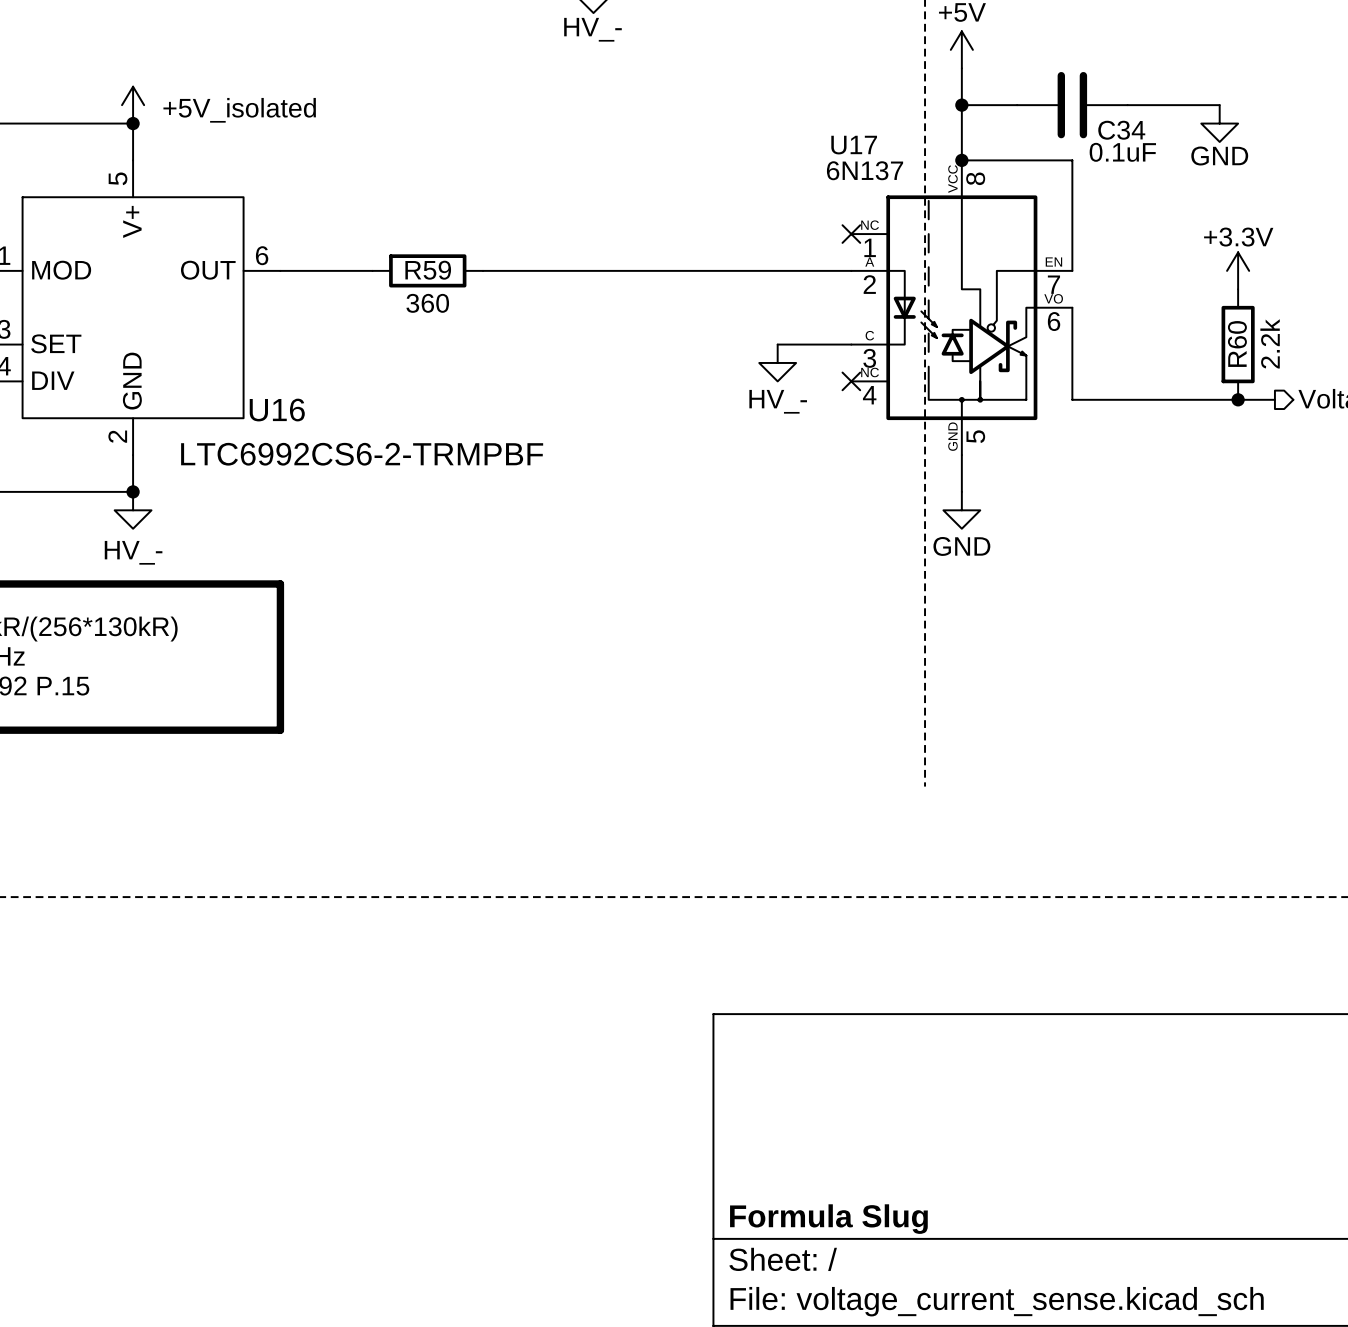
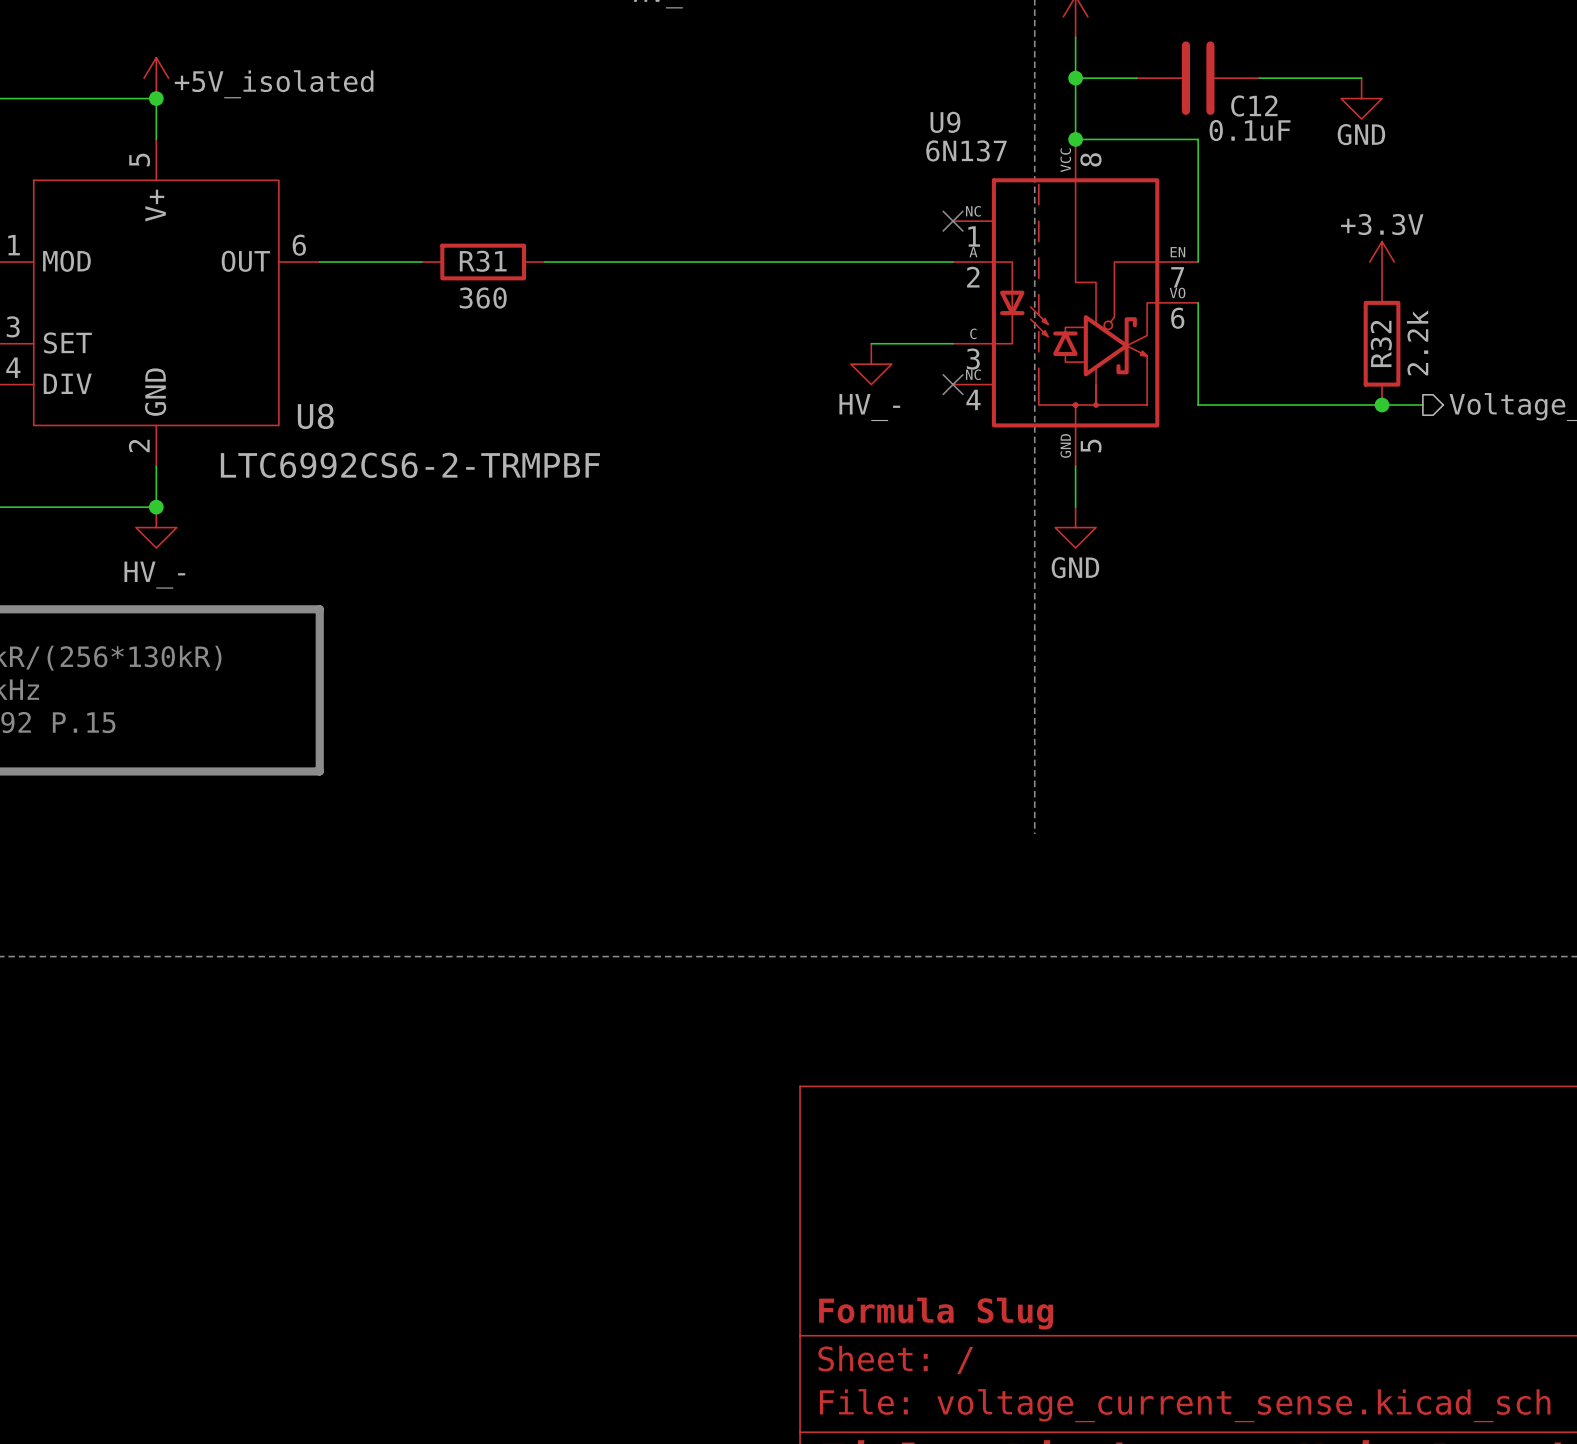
C34 name: C34 (1121, 130) -> C12 (1254, 106)
U17 name: U17 (854, 145) -> U9 (945, 122)
R59 name: R59 (428, 270) -> R31 (483, 261)
R60 name: R60 (1237, 343) -> R32 (1381, 343)
U16 name: U16 (277, 410) -> U8 (315, 416)

